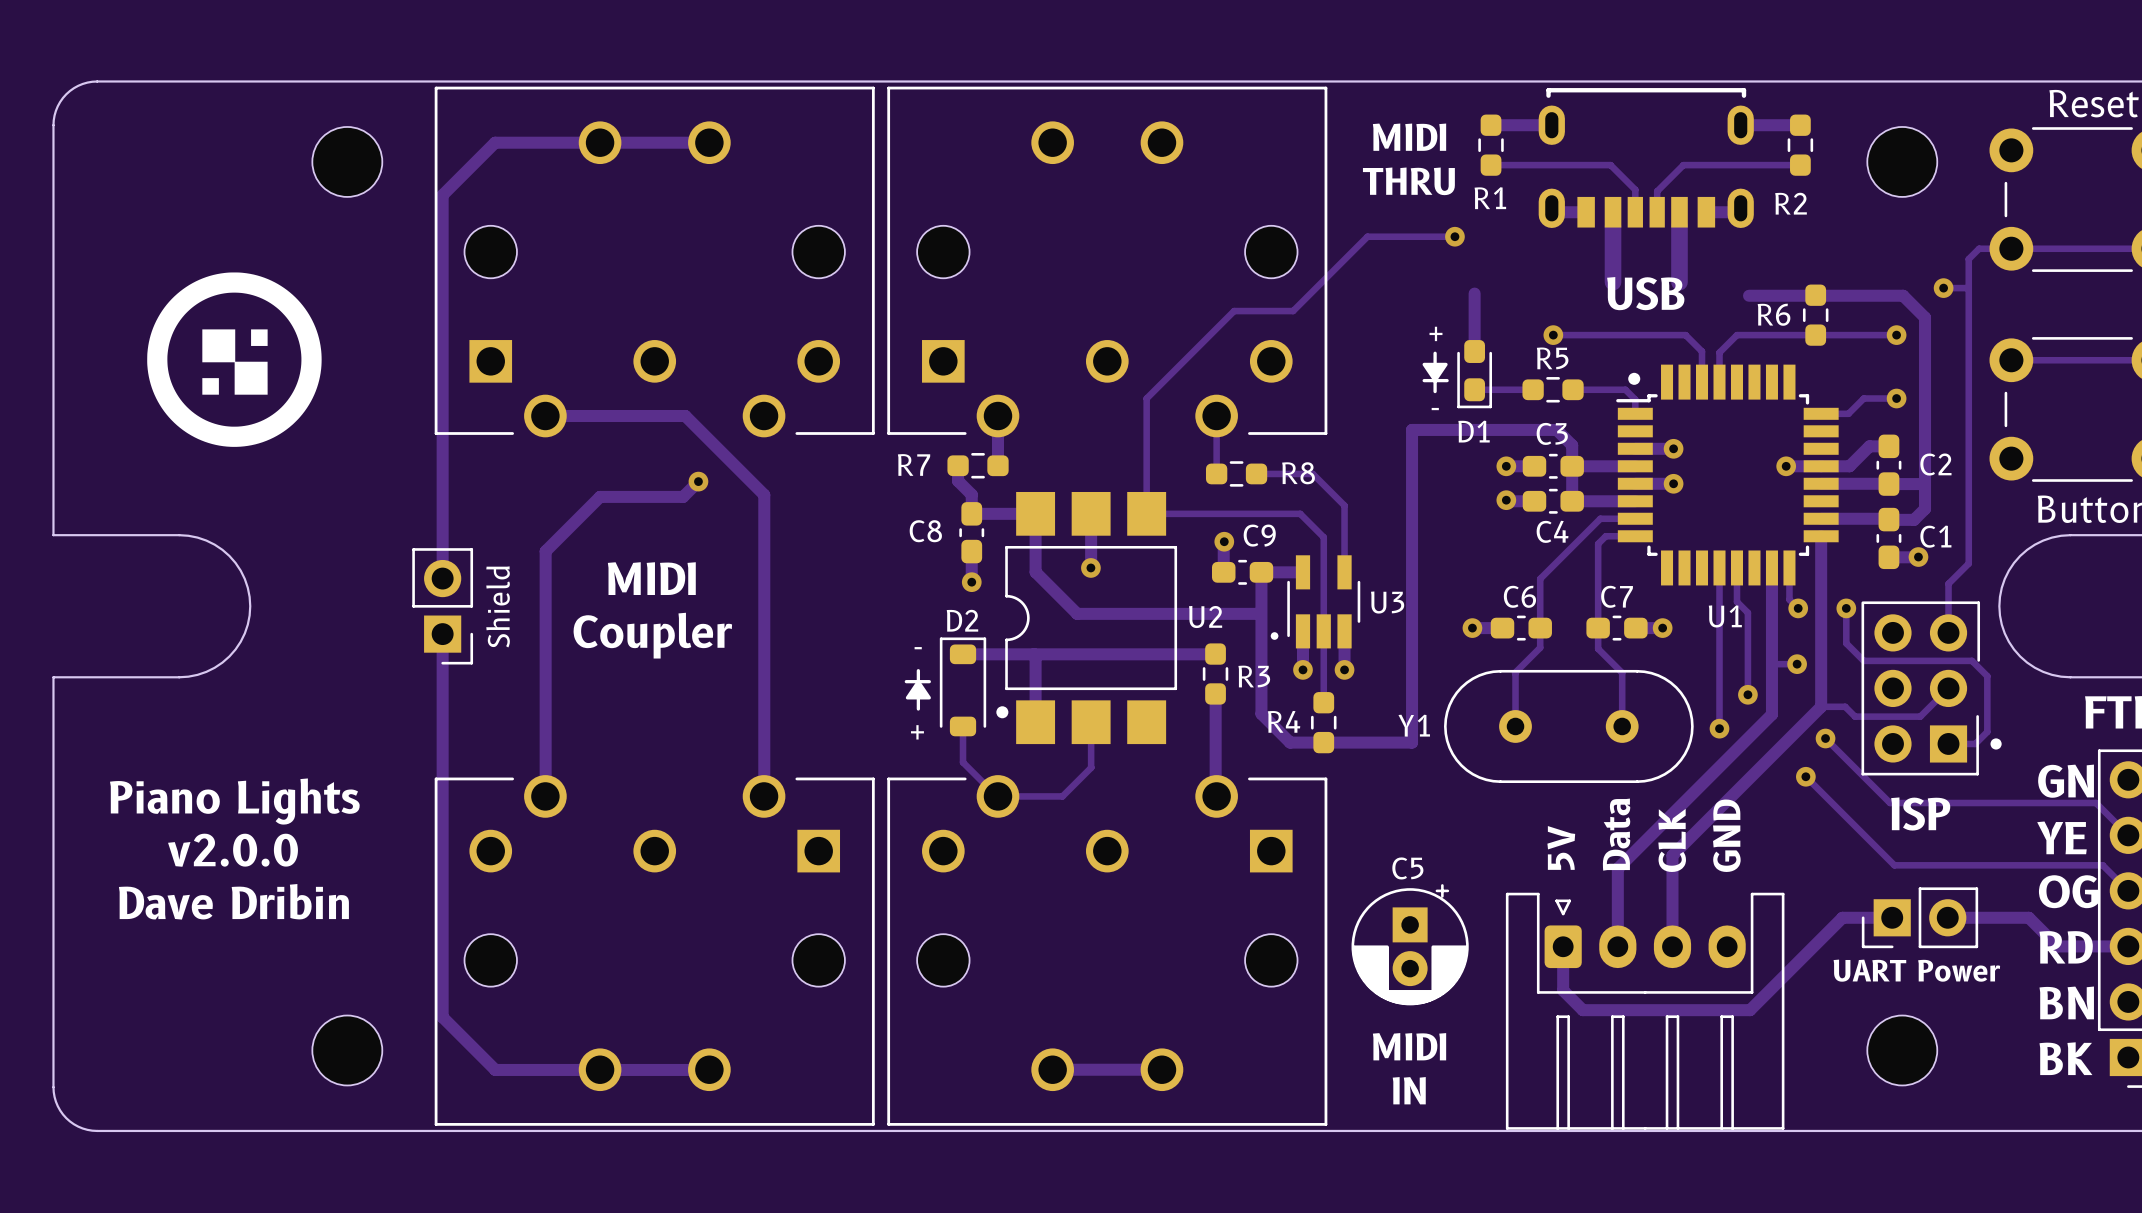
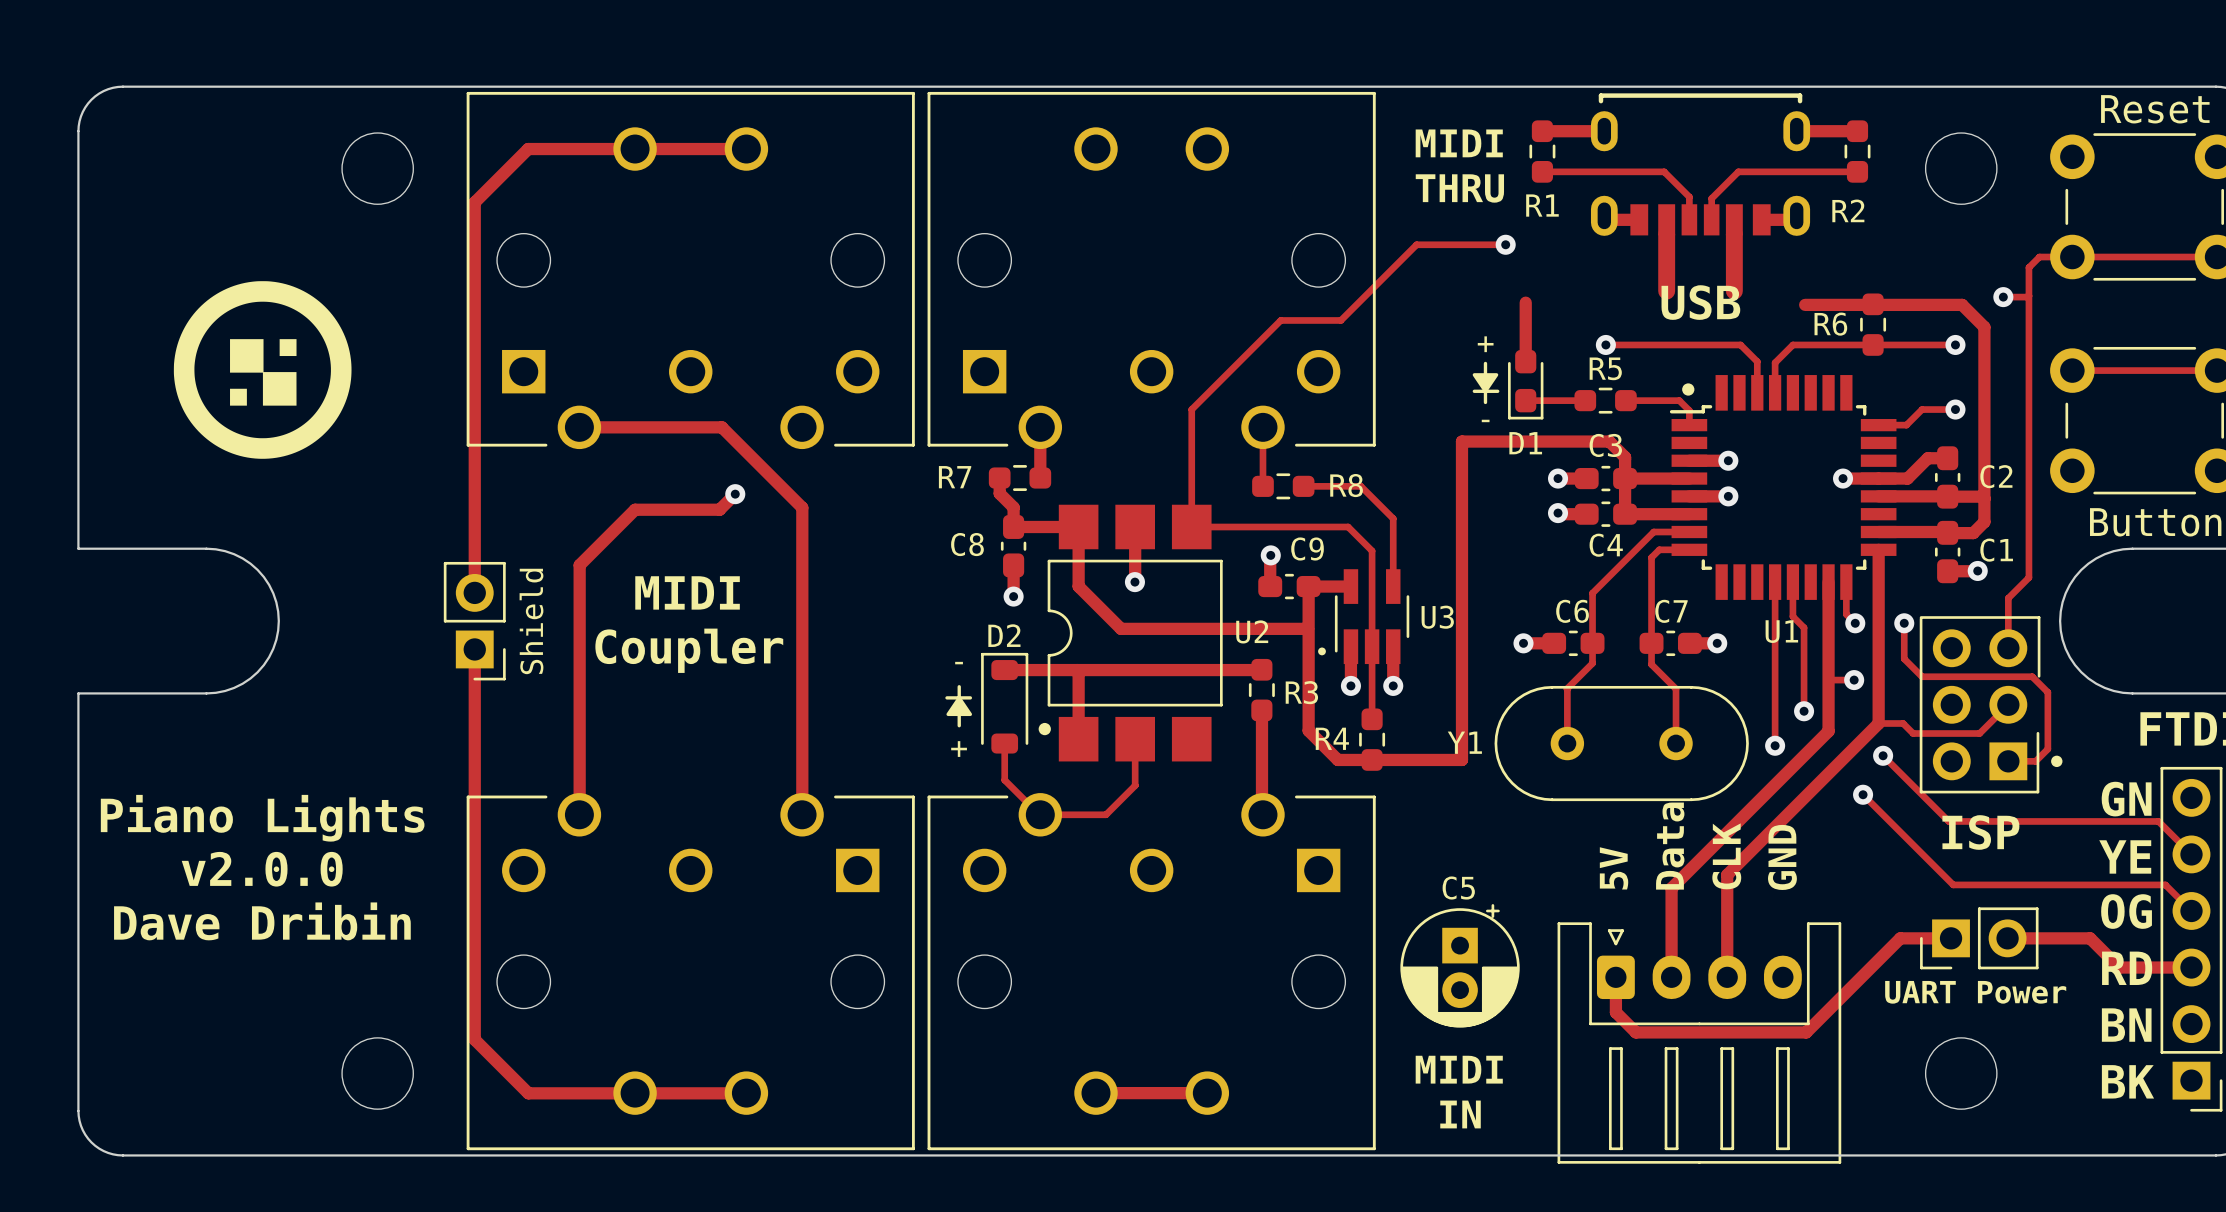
part footprint: [1505, 892, 1785, 1130] -> [1557, 922, 1842, 1164]

